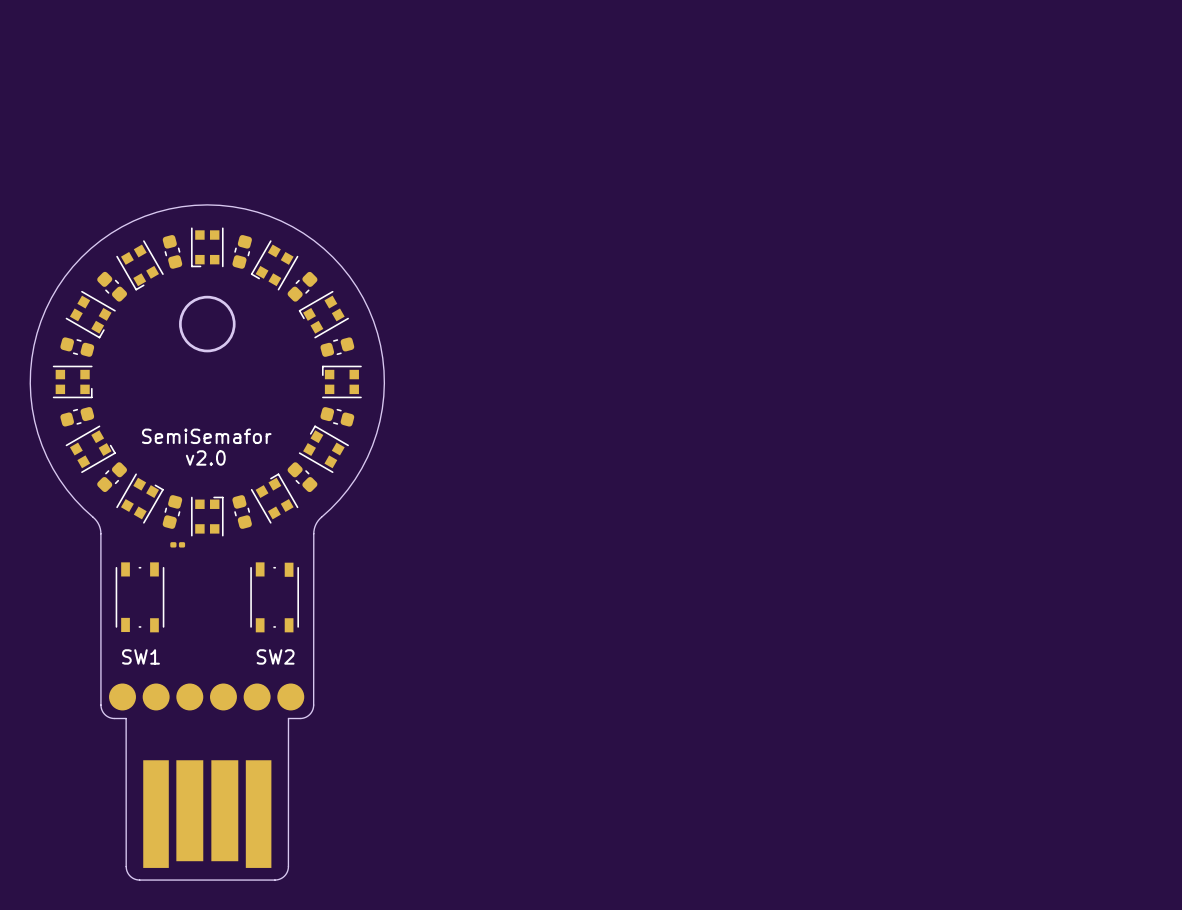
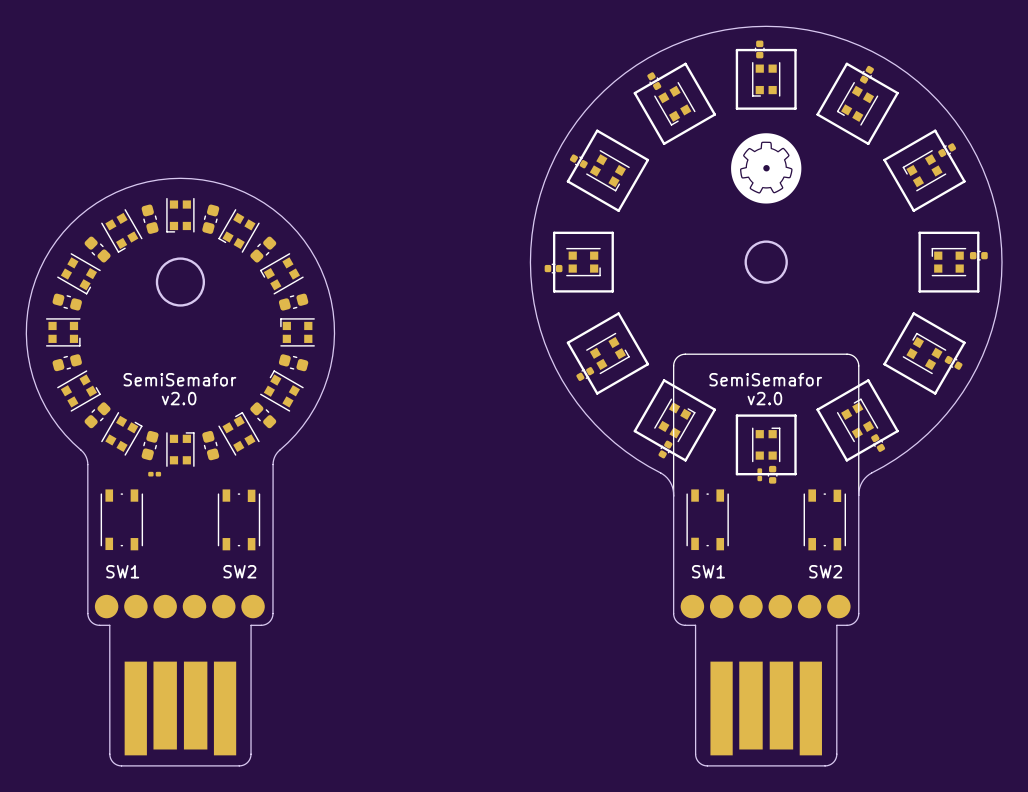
part: none -> (759, 49)
line: none -> (736, 50) (795, 50) (795, 108) (736, 108) (736, 50)
line: none -> (685, 63) (634, 93) (664, 143) (714, 114) (685, 63)
line: none -> (846, 63) (817, 114) (868, 143) (897, 93) (846, 63)
part: none -> (866, 74)
part: none -> (766, 79)
part: none -> (654, 81)
part: none -> (674, 103)
part: none -> (857, 103)
line: none -> (597, 130) (567, 181) (618, 210) (647, 160) (597, 130)
line: none -> (935, 130) (884, 160) (913, 210) (964, 181) (935, 130)
drawing: none -> [731, 133, 802, 204]
part: none -> (947, 150)
part: none -> (578, 161)
part: none -> (607, 170)
part: none -> (924, 170)
line: none -> (554, 232) (612, 232) (612, 291) (554, 291) (554, 232)
line: none -> (919, 232) (978, 232) (978, 291) (919, 291) (919, 232)
round board edge: none -> [744, 240, 788, 284]
part: none -> (978, 255)
part: none -> (583, 262)
part: none -> (948, 262)
part: none -> (553, 268)
line: none -> (618, 313) (647, 364) (597, 393) (567, 342) (618, 313)
line: none -> (913, 313) (964, 342) (935, 393) (884, 364) (913, 313)
part: none -> (607, 353)
part: none -> (924, 353)
part: none -> (953, 362)
part: none -> (585, 374)
text: none -> SemiSemafor (765, 379)
line: none -> (664, 380) (714, 409) (685, 460) (634, 431) (664, 380)
line: none -> (868, 380) (897, 431) (846, 460) (817, 409) (868, 380)
text: none -> v2.0 (764, 398)
line: none -> (736, 415) (736, 474) (795, 474) (795, 415) (736, 415)
part: none -> (674, 420)
part: none -> (857, 420)
part: none -> (878, 443)
part: none -> (766, 444)
part: none -> (665, 449)
board edge: none -> (660, 473) (636, 459) (614, 442) (585, 413) (569, 391) (555, 368) (540, 330) (532, 289) (530, 248) (533, 221) (540, 194) (555, 156) (577, 121) (594, 100) (614, 81) (636, 65) (660, 51) (698, 36) (725, 29) (752, 26) (793, 27) (833, 36) (872, 51) (907, 73) (928, 90) (946, 110) (970, 144) (987, 181) (995, 207) (1000, 234) (1001, 276) (998, 303) (987, 343) (976, 368) (963, 391) (946, 413) (927, 433) (895, 459) (867, 476) (859, 487) (858, 614) (852, 624) (836, 625) (836, 754) (831, 764) (825, 765) (707, 765) (697, 760) (695, 754) (695, 625) (680, 624) (673, 616) (673, 492) (670, 482) (660, 473)
part: none -> (759, 474)
part: none -> (772, 474)
line: none -> (858, 495) (858, 365) (854, 356) (847, 354) (685, 354) (678, 356) (673, 364) (673, 496)
part: none -> (707, 519)
part: none -> (824, 519)
text: none -> SW1 (708, 571)
text: none -> SW2 (825, 571)
part: none -> (765, 606)
part: none -> (766, 708)

